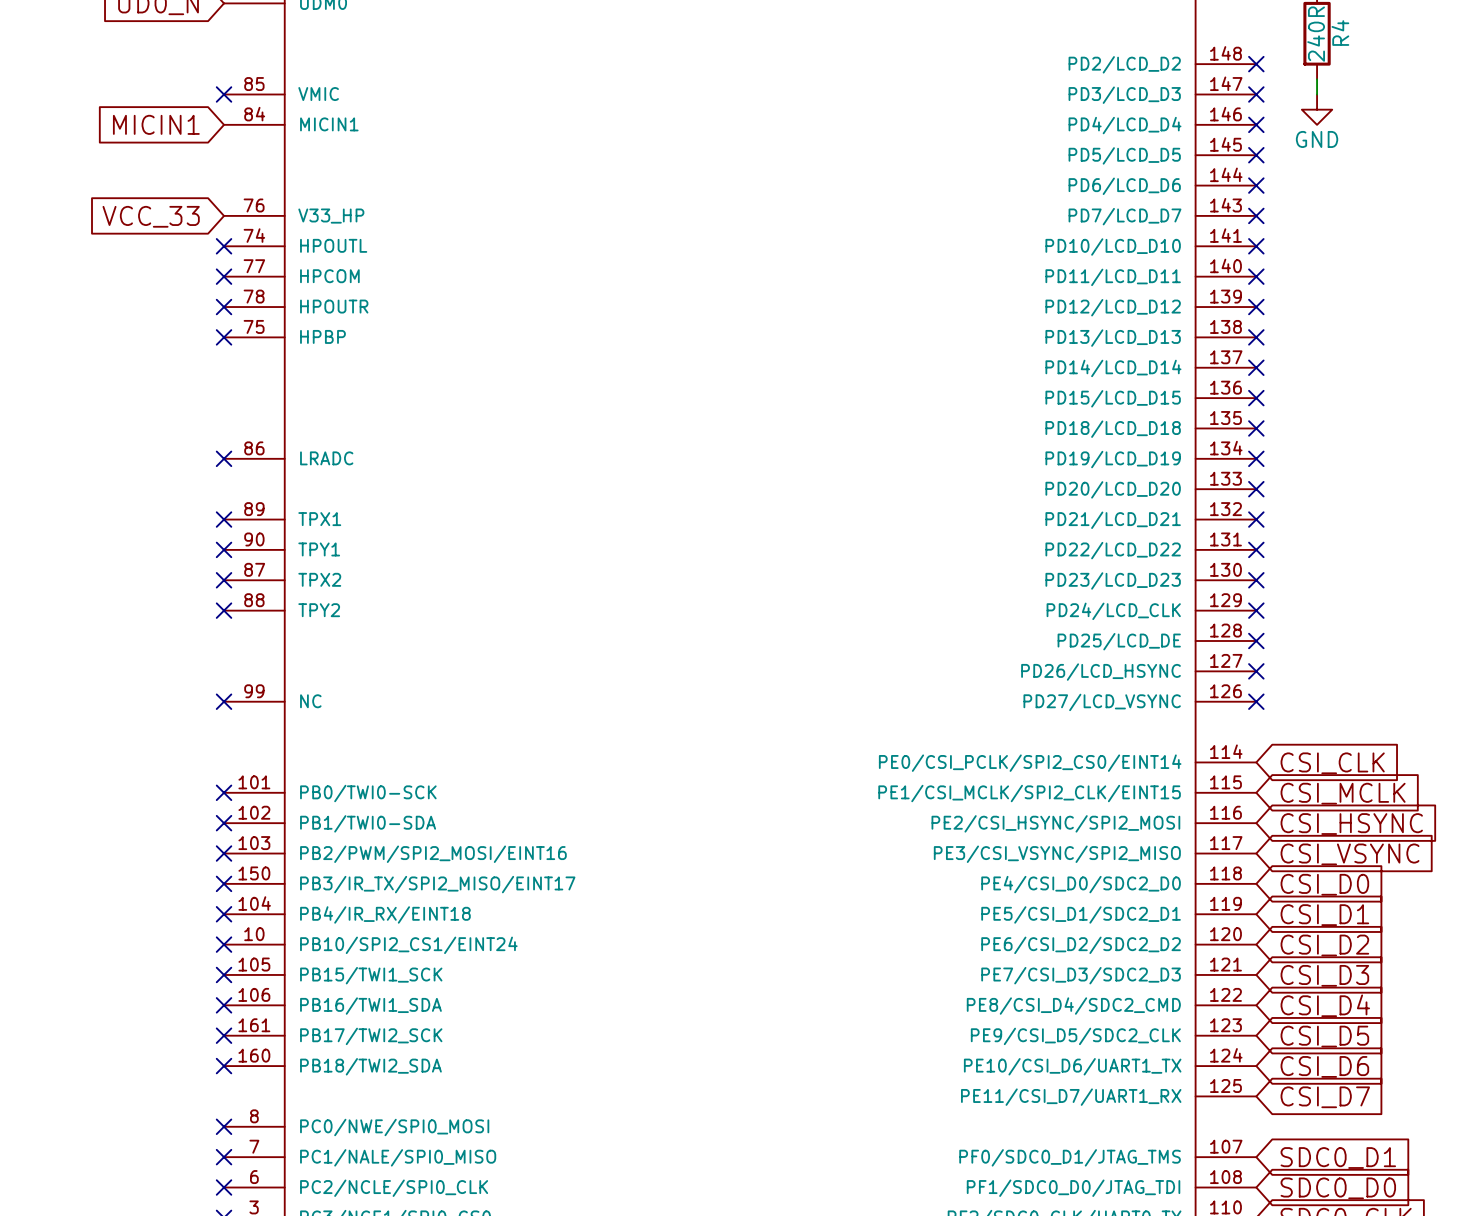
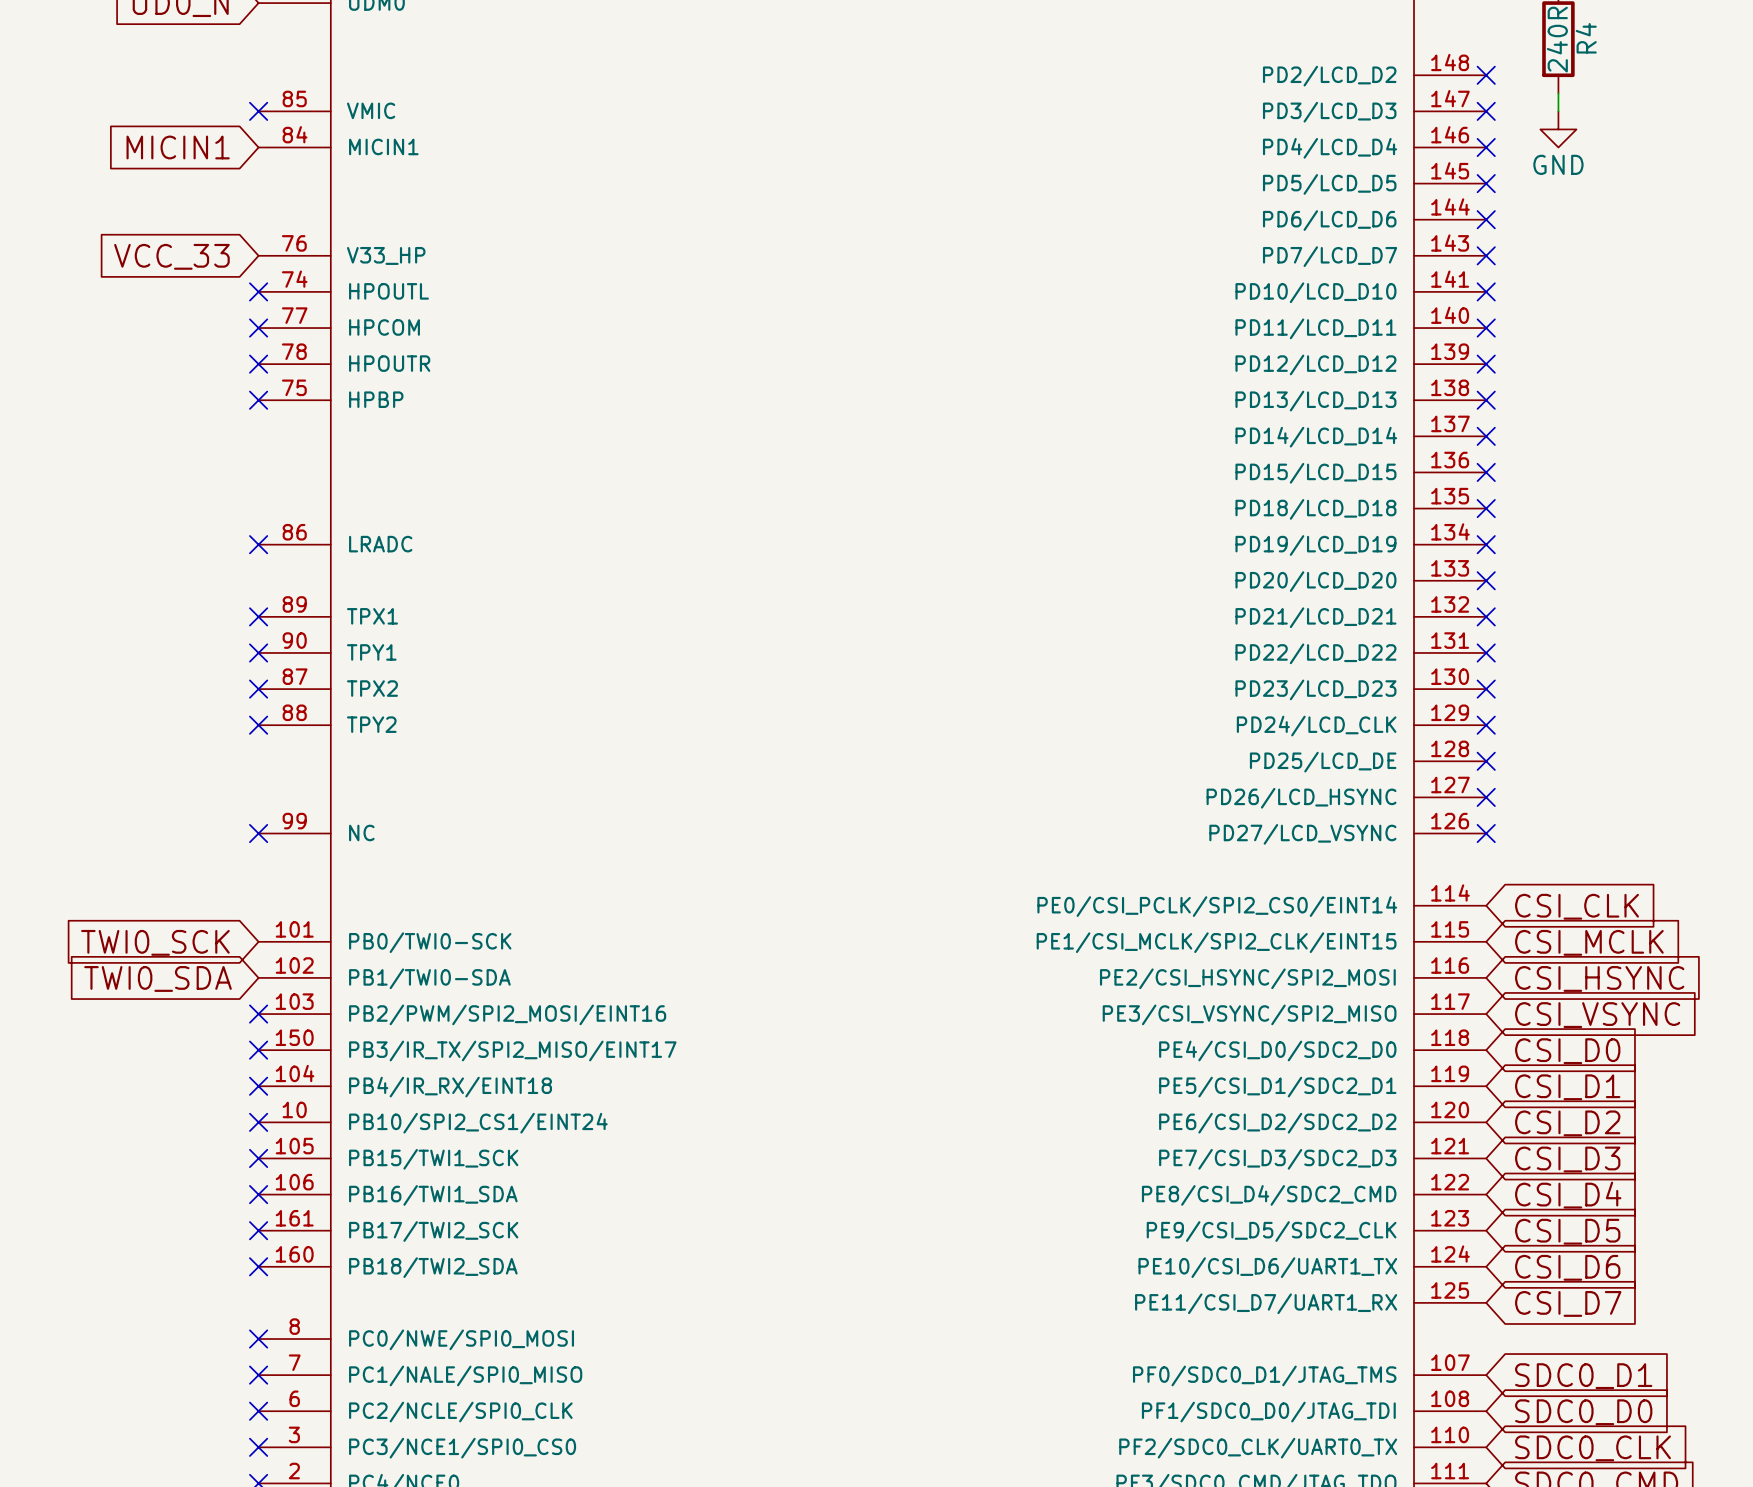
no-connect mark: (224, 792) -> none
global label: none -> TWI0_SCK (155, 942)
no-connect mark: (224, 823) -> none
global label: none -> TWI0_SDA (158, 978)

